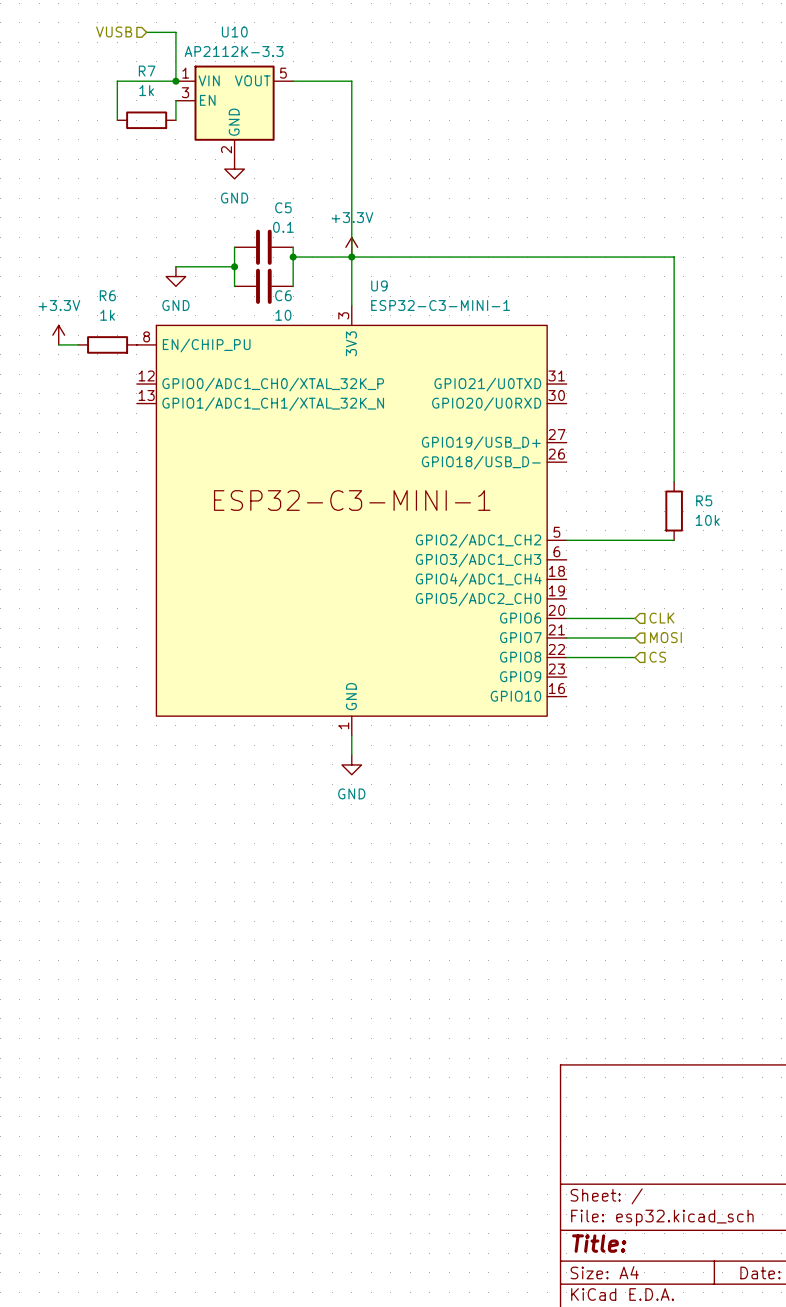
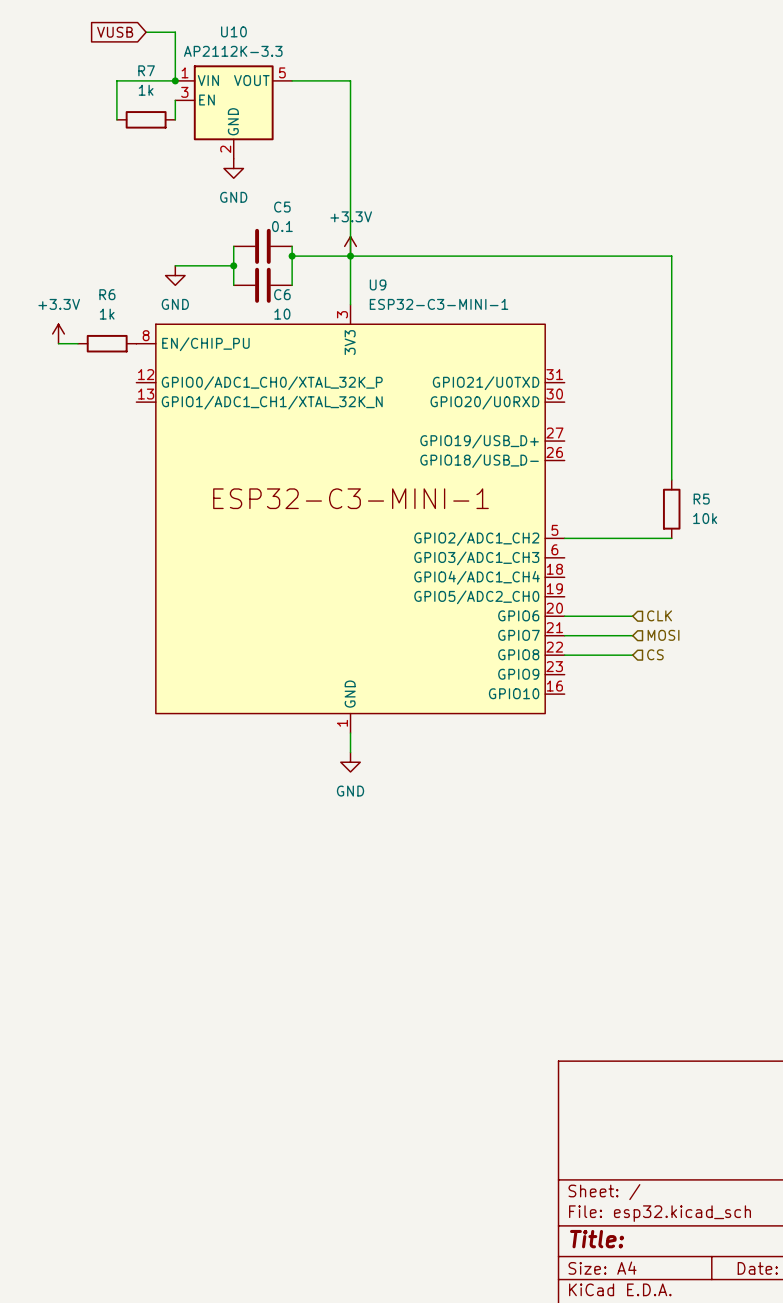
hierarchical label: VUSB (114, 31) -> none
global label: none -> VUSB (115, 32)

